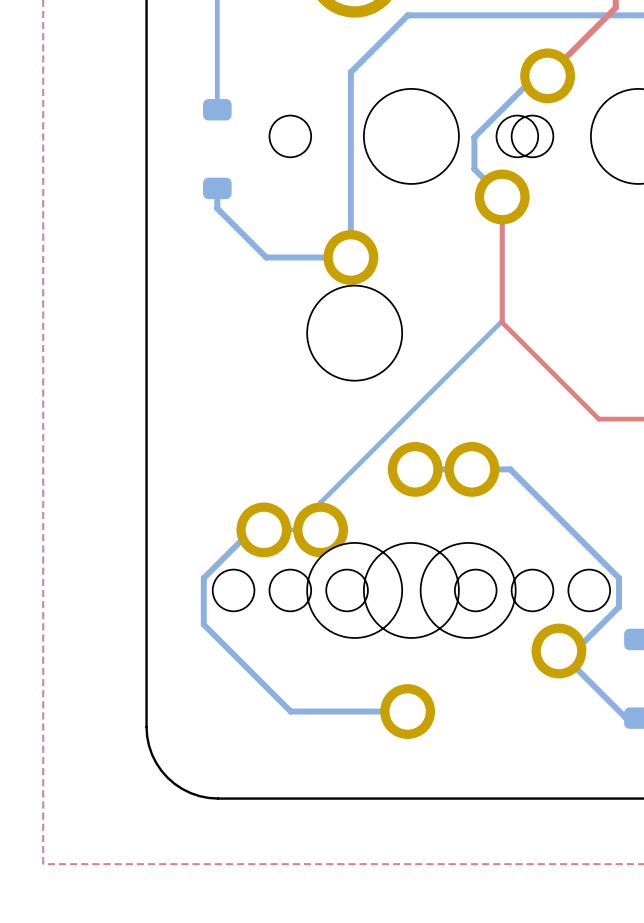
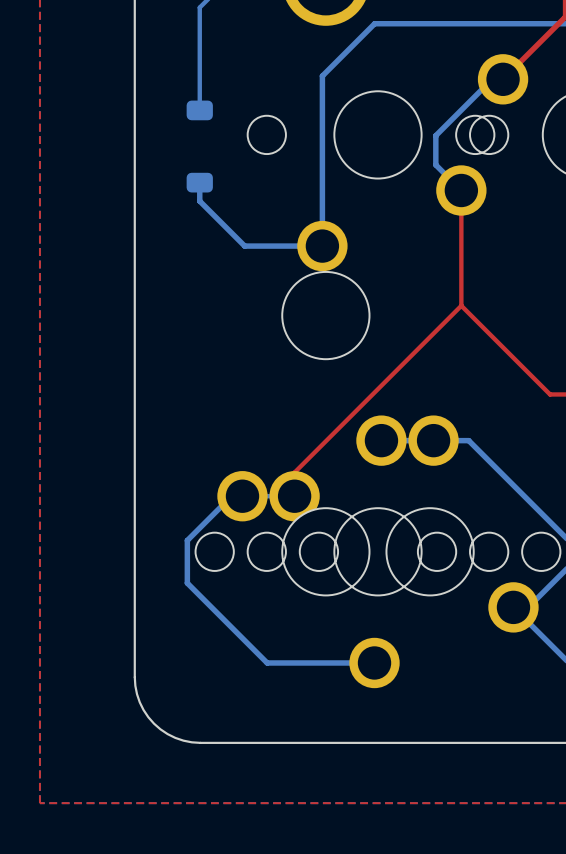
bottom track: (502, 196) (502, 321) (320, 502) (320, 529) -> none
top track: none -> (461, 305) (294, 472) (294, 496)

